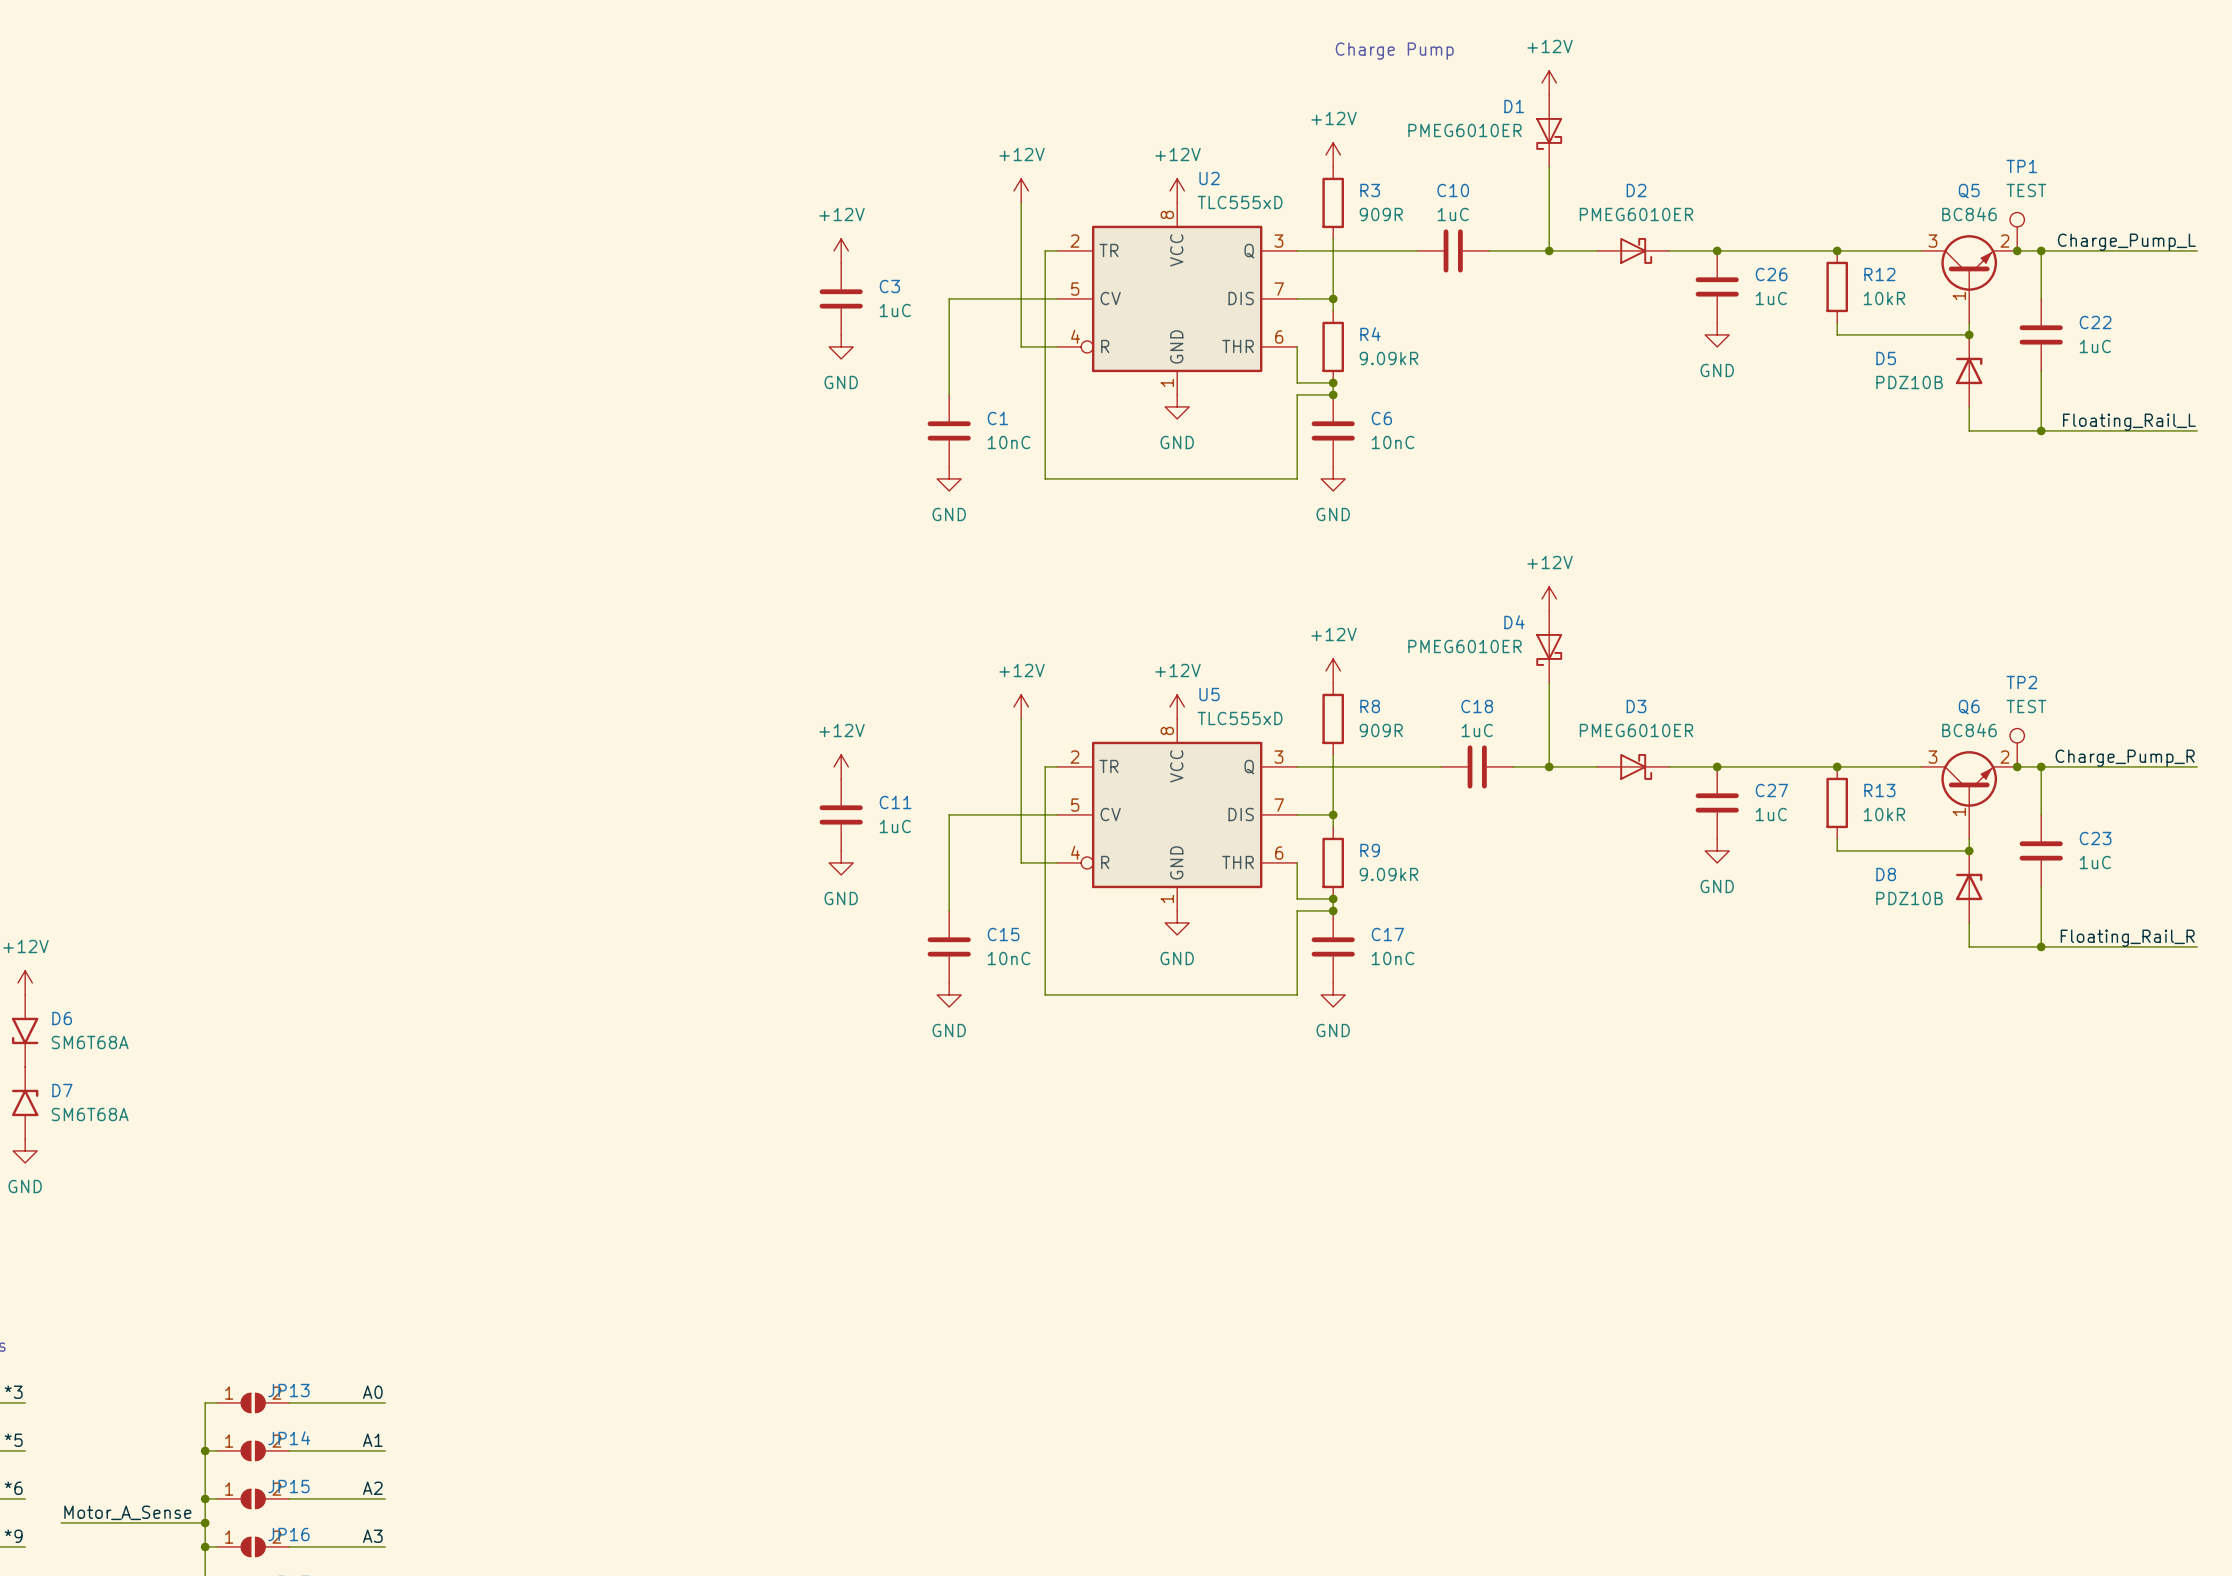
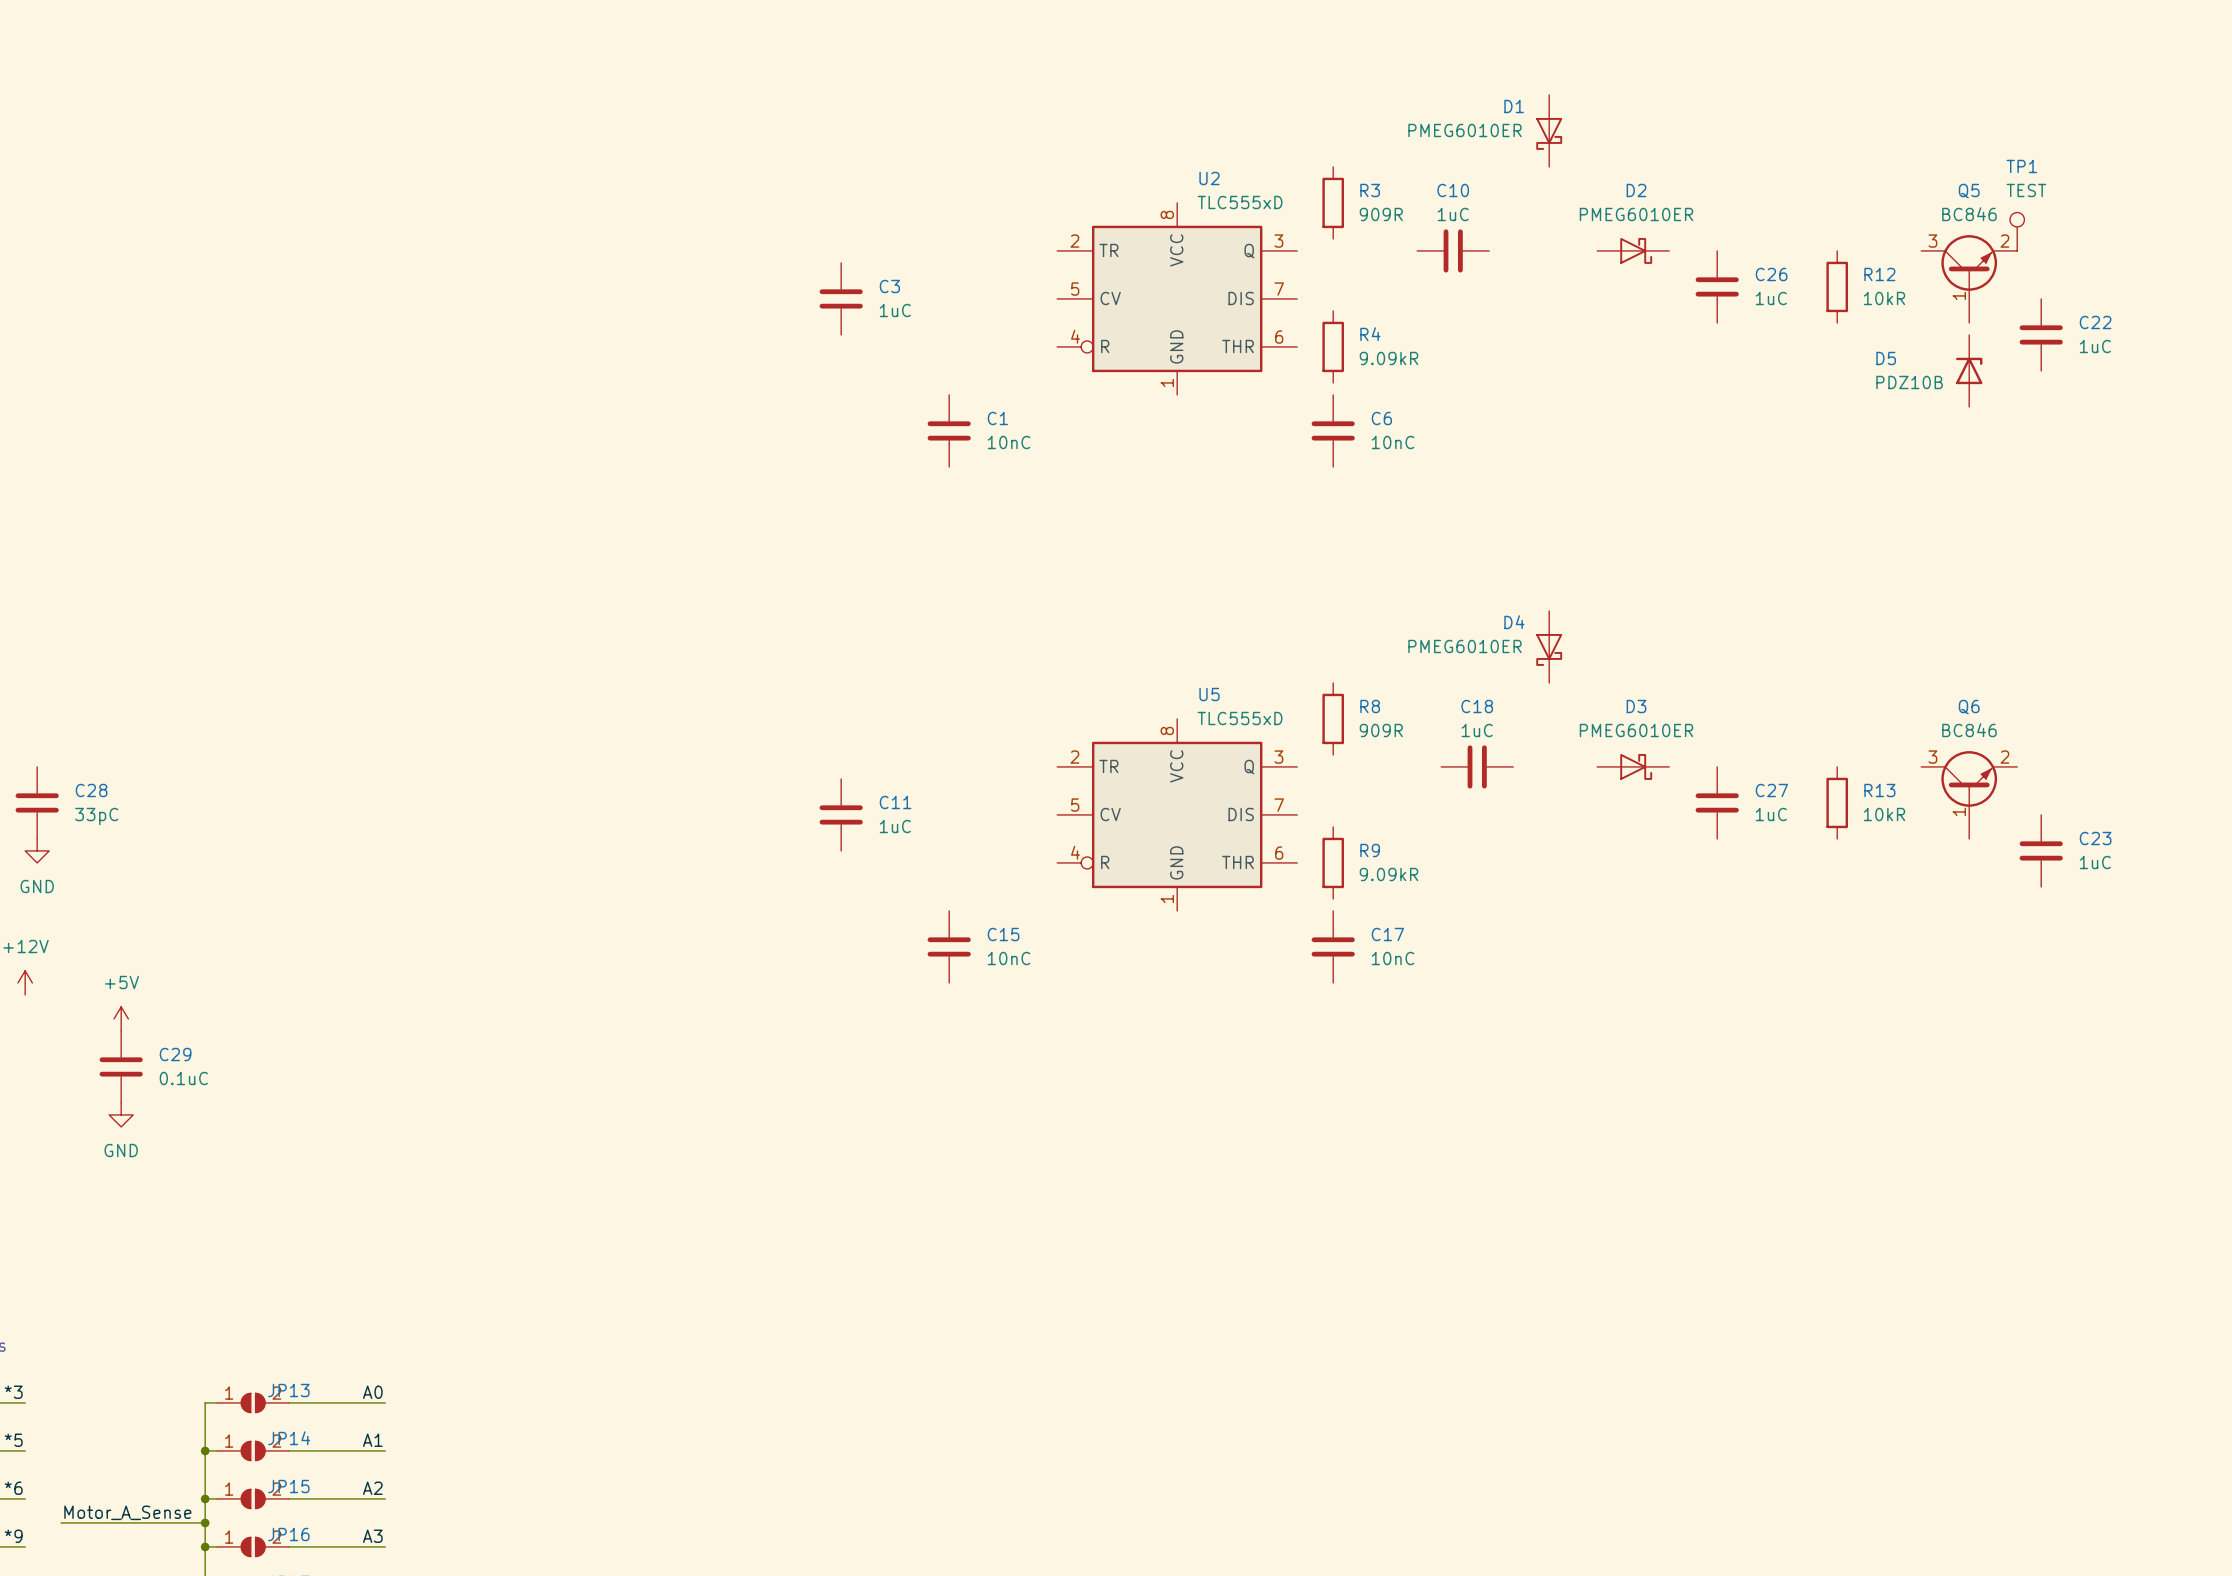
text: Charge Pump (1394, 51) -> none
power symbol: +12V (1549, 82) -> none
power symbol: +12V (1333, 154) -> none
wire: (1549, 166) (1549, 250) -> none
power symbol: +12V (1021, 190) -> none
power symbol: +12V (1177, 190) -> none
wire: (1021, 202) (1021, 346) (1057, 346) -> none
wire: (1333, 238) (1333, 310) -> none
label: Charge_Pump_L (2126, 242) -> none
power symbol: +12V (841, 250) -> none
wire: (1057, 250) (1045, 250) (1045, 478) (1297, 478) (1297, 394) (1333, 394) (1333, 382) (1297, 382) (1297, 346) -> none
wire: (1297, 250) (1417, 250) -> none
wire: (1489, 250) (1597, 250) -> none
junction: (1549, 250) -> none
wire: (1669, 250) (1921, 250) -> none
junction: (1717, 250) -> none
junction: (1837, 250) -> none
wire: (2017, 250) (2197, 250) -> none
junction: (2017, 250) -> none
wire: (2041, 250) (2041, 298) -> none
junction: (2041, 250) -> none
wire: (1057, 298) (949, 298) (949, 394) -> none
wire: (1297, 298) (1333, 298) -> none
junction: (1333, 298) -> none
wire: (1837, 322) (1837, 334) (1969, 334) (1969, 322) -> none
power symbol: GND (1717, 334) -> none
junction: (1969, 334) -> none
power symbol: GND (841, 346) -> none
wire: (2041, 370) (2041, 430) -> none
junction: (1333, 382) -> none
junction: (1333, 394) -> none
power symbol: GND (1177, 406) -> none
wire: (1969, 406) (1969, 430) (2197, 430) -> none
label: Floating_Rail_L (2129, 422) -> none
junction: (2041, 430) -> none
power symbol: GND (949, 478) -> none
power symbol: GND (1333, 478) -> none
power symbol: +12V (1549, 598) -> none
power symbol: +12V (1333, 670) -> none
wire: (1549, 682) (1549, 766) -> none
power symbol: +12V (1021, 706) -> none
power symbol: +12V (1177, 706) -> none
wire: (1021, 718) (1021, 862) (1057, 862) -> none
TP2: TEST (2017, 747) -> none
wire: (1333, 754) (1333, 826) -> none
label: Charge_Pump_R (2125, 758) -> none
power symbol: +12V (841, 766) -> none
wire: (1057, 766) (1045, 766) (1045, 994) (1297, 994) (1297, 910) (1333, 910) (1333, 898) (1297, 898) (1297, 862) -> none
wire: (1297, 766) (1441, 766) -> none
wire: (1513, 766) (1597, 766) -> none
junction: (1549, 766) -> none
wire: (1669, 766) (1921, 766) -> none
junction: (1717, 766) -> none
junction: (1837, 766) -> none
wire: (2017, 766) (2197, 766) -> none
junction: (2017, 766) -> none
wire: (2041, 766) (2041, 814) -> none
junction: (2041, 766) -> none
C28: none -> 33pC (37, 802)
wire: (1057, 814) (949, 814) (949, 910) -> none
wire: (1297, 814) (1333, 814) -> none
junction: (1333, 814) -> none
wire: (1837, 838) (1837, 850) (1969, 850) (1969, 838) -> none
power symbol: none -> GND (37, 850)
power symbol: GND (1717, 850) -> none
junction: (1969, 850) -> none
power symbol: GND (841, 862) -> none
D8: PDZ10B (1969, 886) -> none
wire: (2041, 886) (2041, 946) -> none
junction: (1333, 898) -> none
junction: (1333, 910) -> none
power symbol: GND (1177, 922) -> none
wire: (1969, 922) (1969, 946) (2197, 946) -> none
label: Floating_Rail_R (2127, 938) -> none
junction: (2041, 946) -> none
power symbol: GND (949, 994) -> none
power symbol: GND (1333, 994) -> none
power symbol: none -> +5V (121, 1018)
D6: SM6T68A (25, 1030) -> none
C29: none -> 0.1uC (121, 1066)
D7: SM6T68A (25, 1102) -> none
power symbol position: GND (25, 1150) -> GND (121, 1114)

